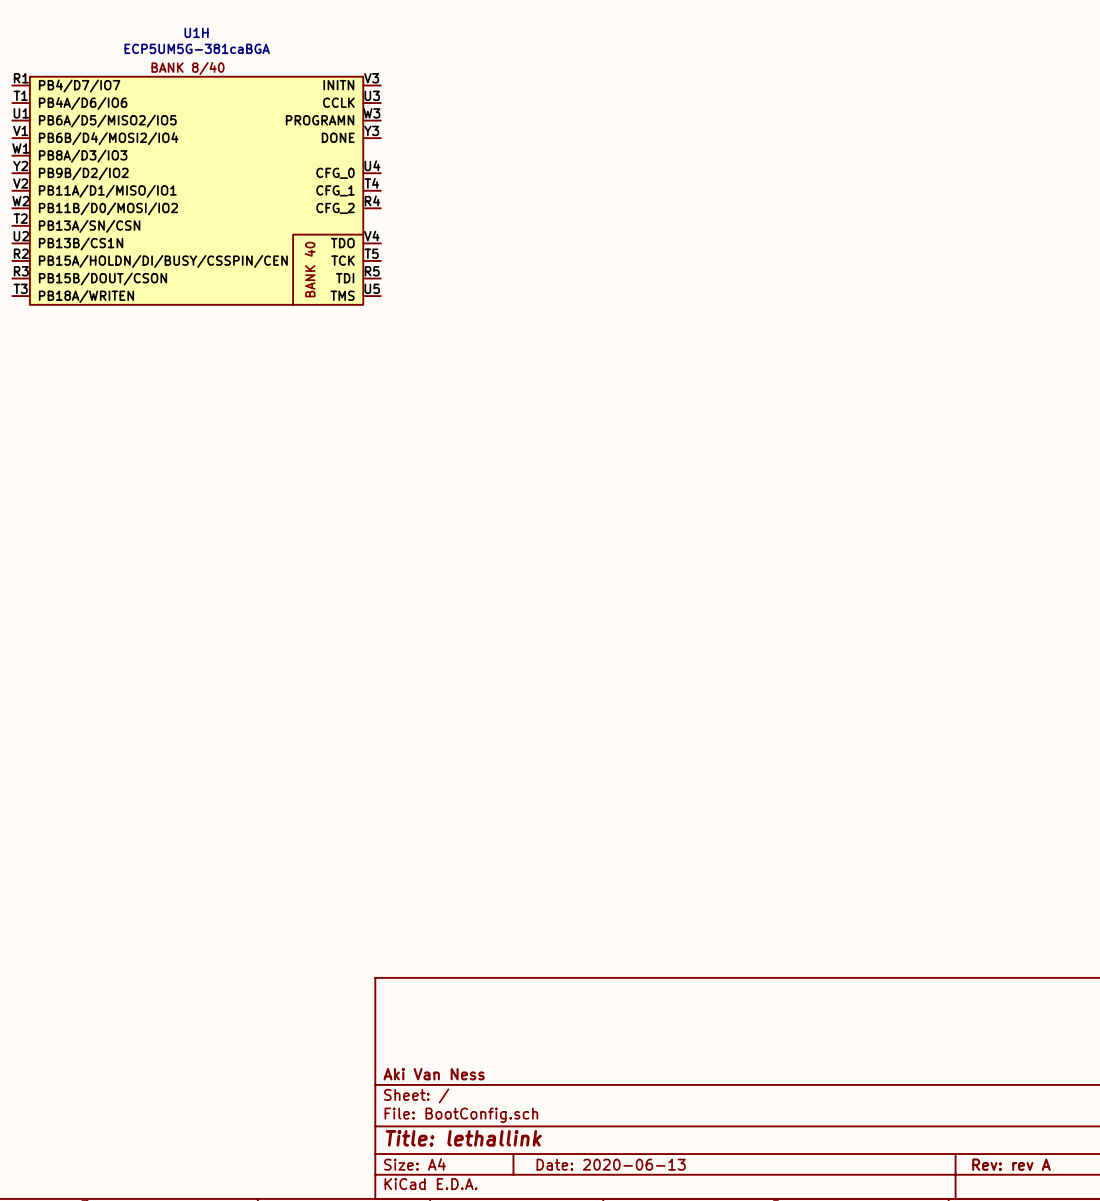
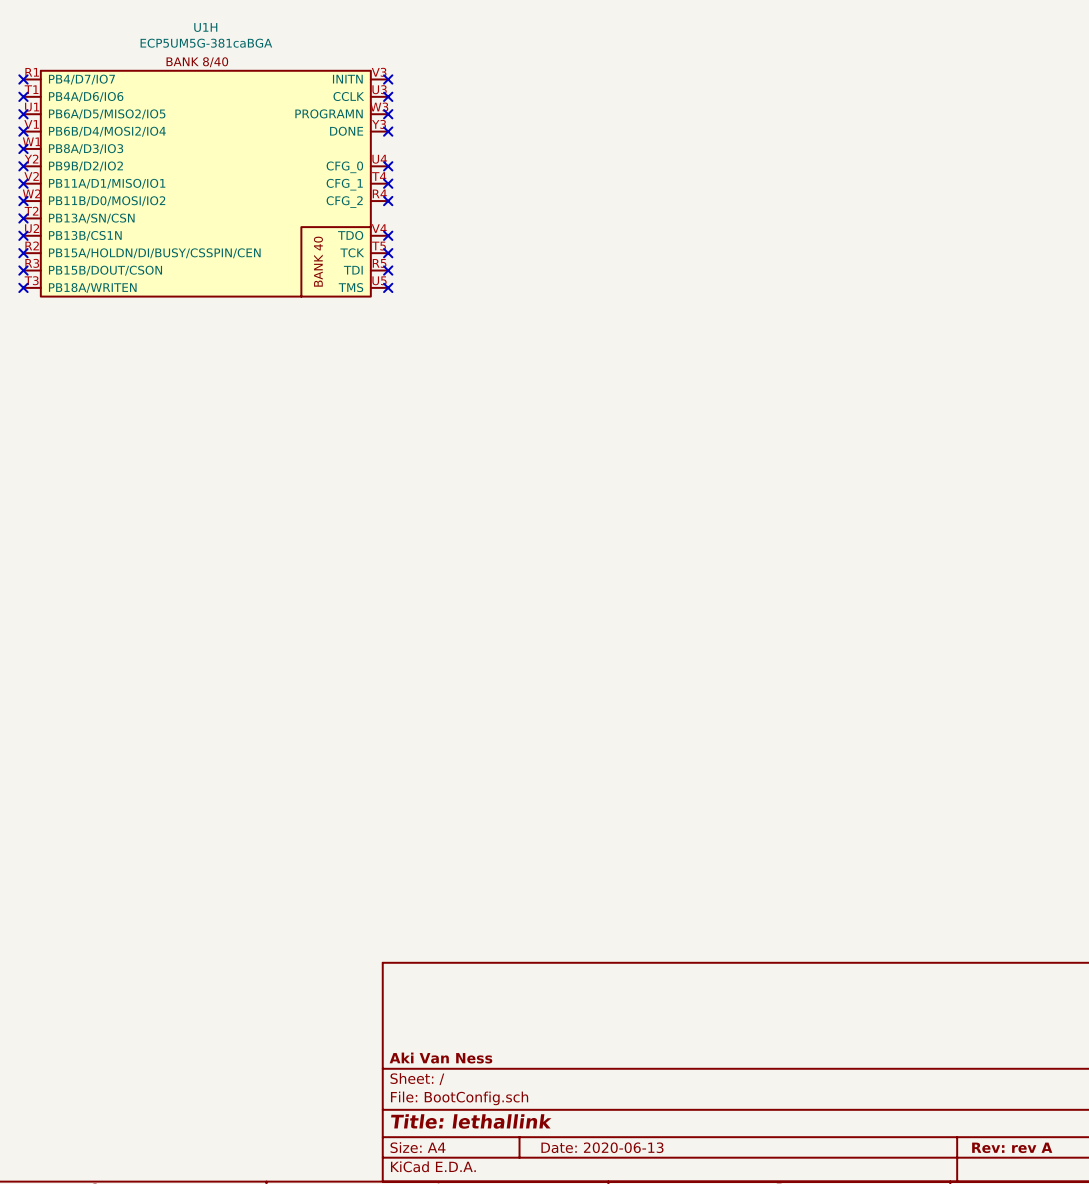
no-connect mark: none -> (23, 79)
no-connect mark: none -> (388, 79)
no-connect mark: none -> (23, 96)
no-connect mark: none -> (388, 96)
no-connect mark: none -> (23, 114)
no-connect mark: none -> (388, 114)
no-connect mark: none -> (23, 131)
no-connect mark: none -> (388, 131)
no-connect mark: none -> (23, 148)
no-connect mark: none -> (23, 166)
no-connect mark: none -> (388, 166)
no-connect mark: none -> (23, 183)
no-connect mark: none -> (388, 183)
no-connect mark: none -> (23, 201)
no-connect mark: none -> (388, 201)
no-connect mark: none -> (23, 218)
no-connect mark: none -> (23, 235)
no-connect mark: none -> (388, 235)
no-connect mark: none -> (23, 253)
no-connect mark: none -> (388, 253)
no-connect mark: none -> (23, 270)
no-connect mark: none -> (388, 270)
no-connect mark: none -> (23, 287)
no-connect mark: none -> (388, 287)

